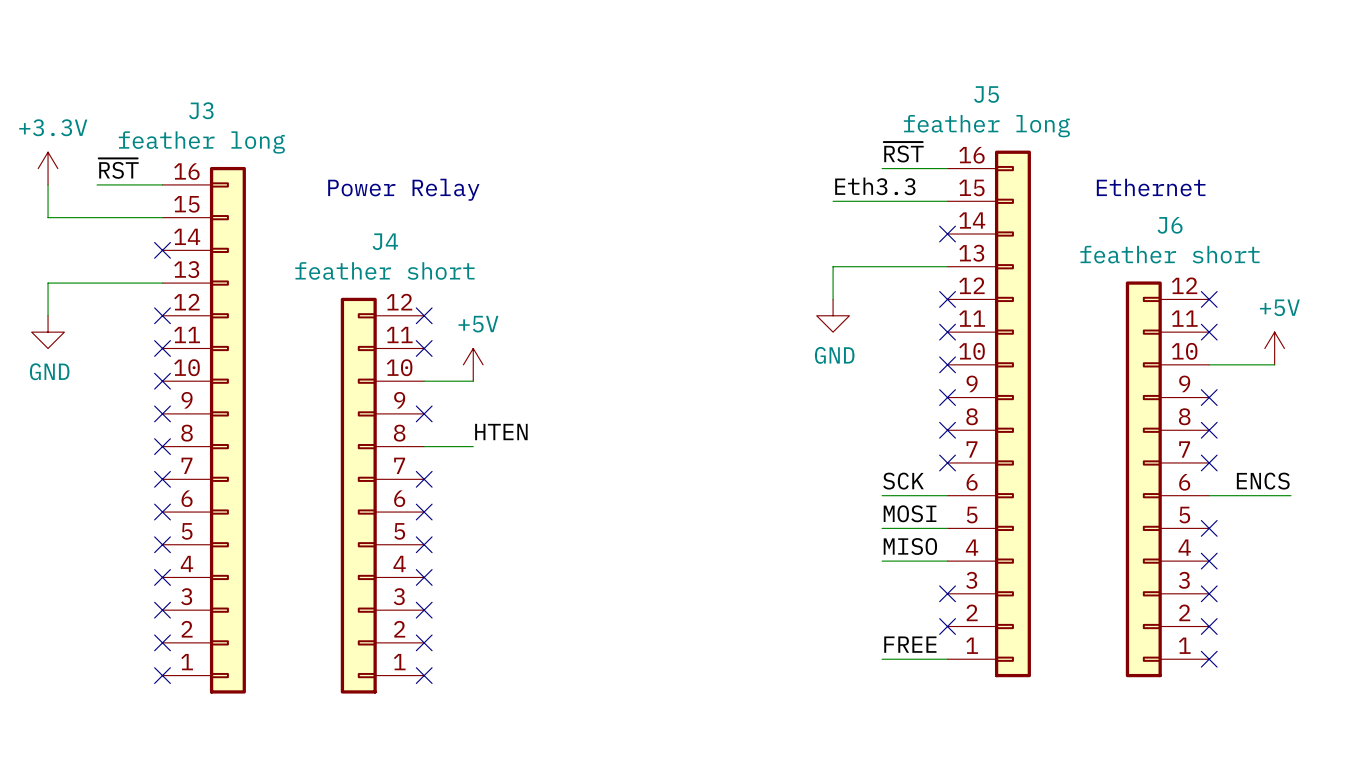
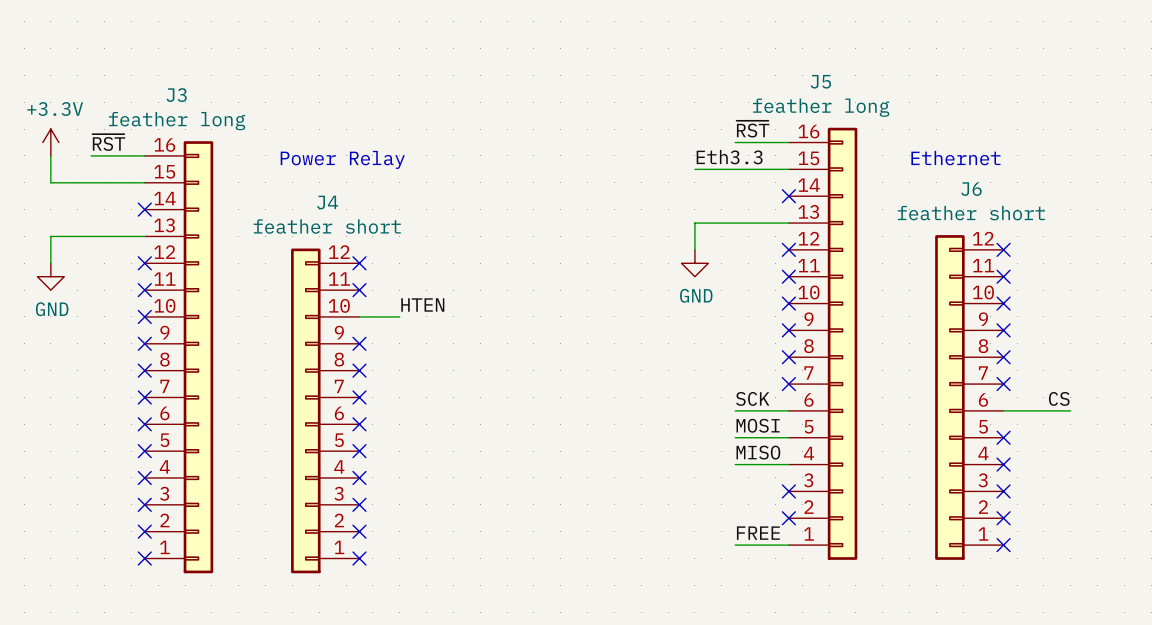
power symbol: +5V (1274, 348) -> none
power symbol: +5V (473, 364) -> none
wire: (1209, 364) (1274, 364) -> none
no-connect mark: none -> (1003, 303)
label position: HTEN (501, 432) -> HTEN (422, 304)
wire: (424, 446) (473, 446) -> none
no-connect mark: none -> (359, 370)
label: ENCS (1263, 481) -> CS (1059, 398)

